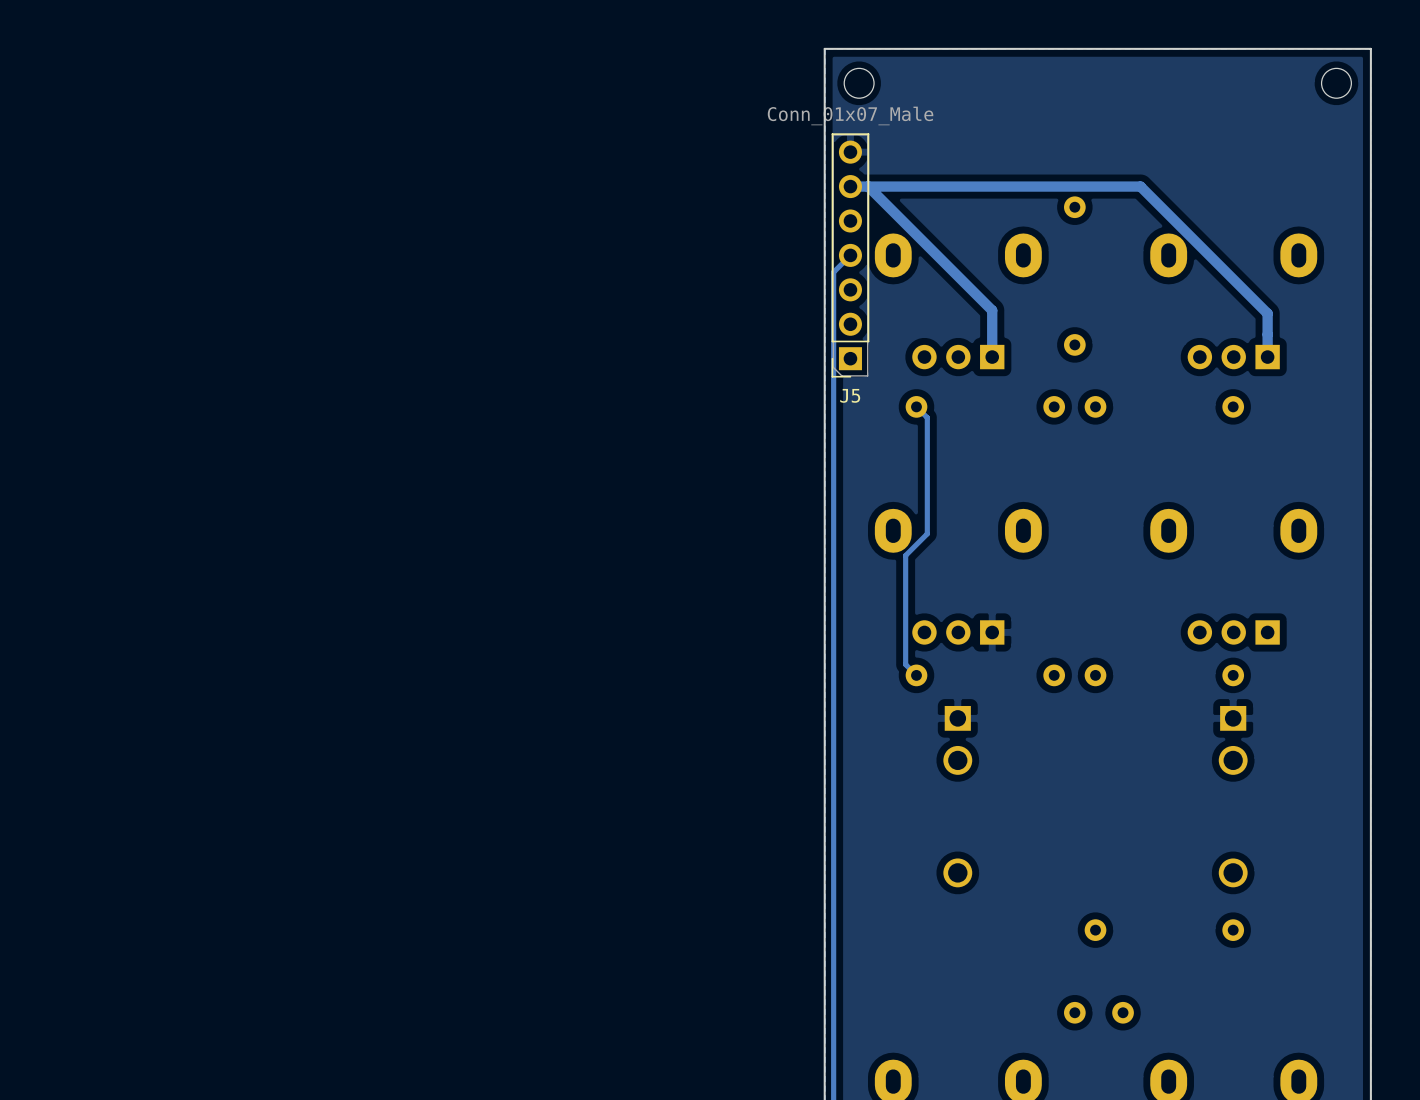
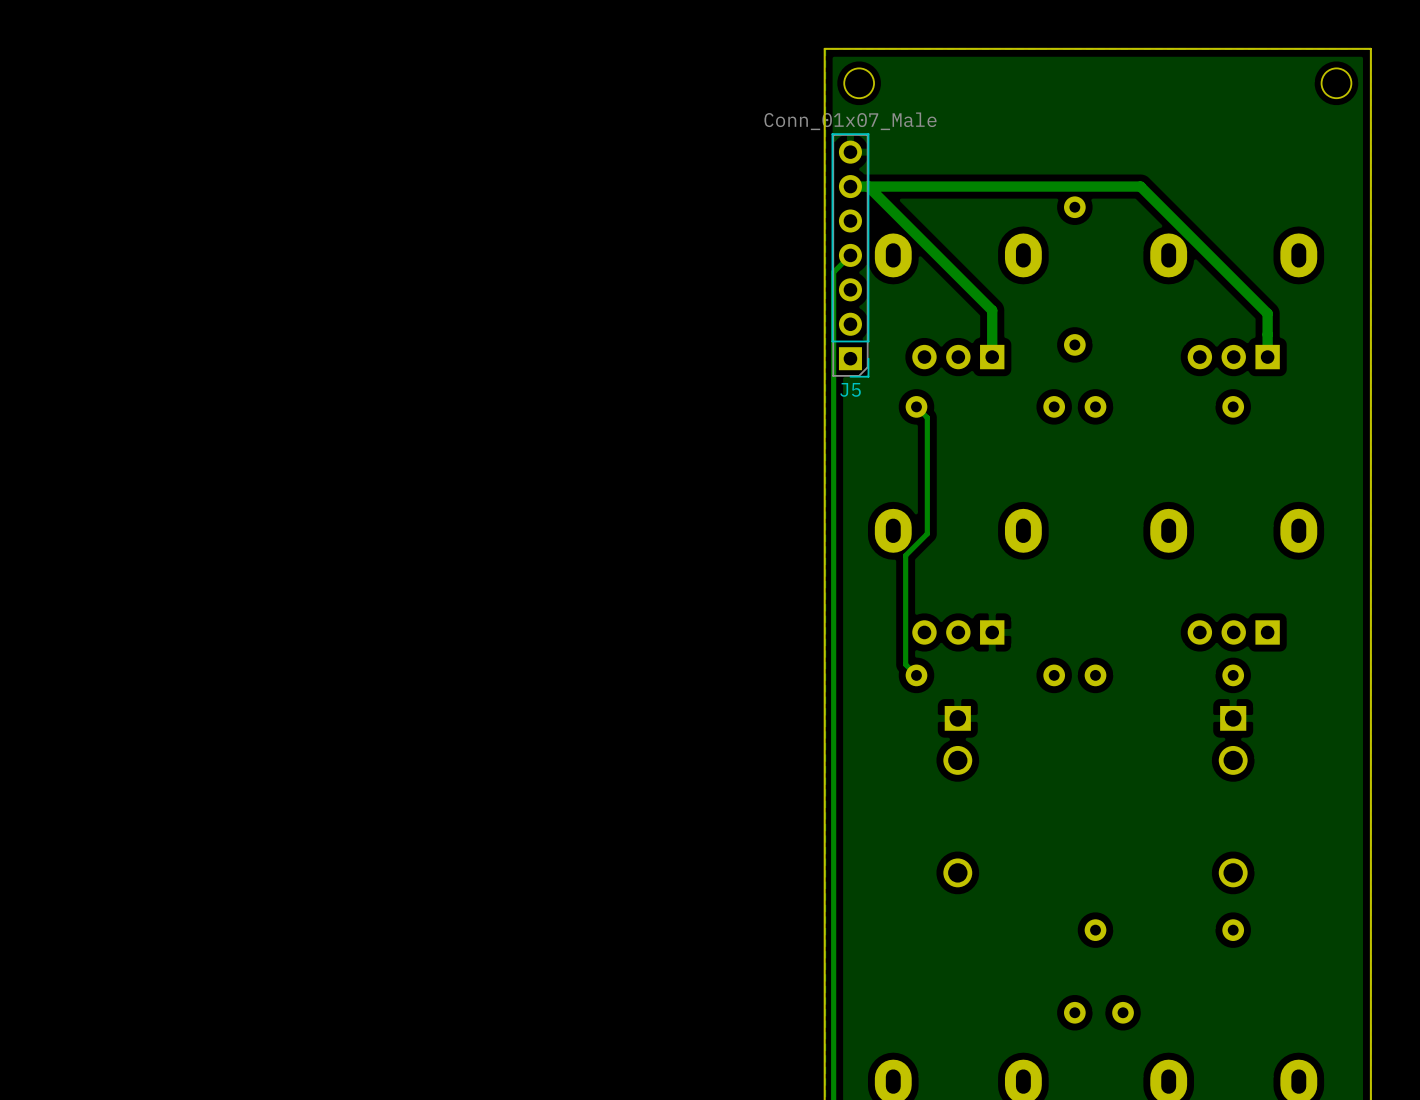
J5 footprint: [831, 133, 870, 378] -> [831, 133, 870, 378]

